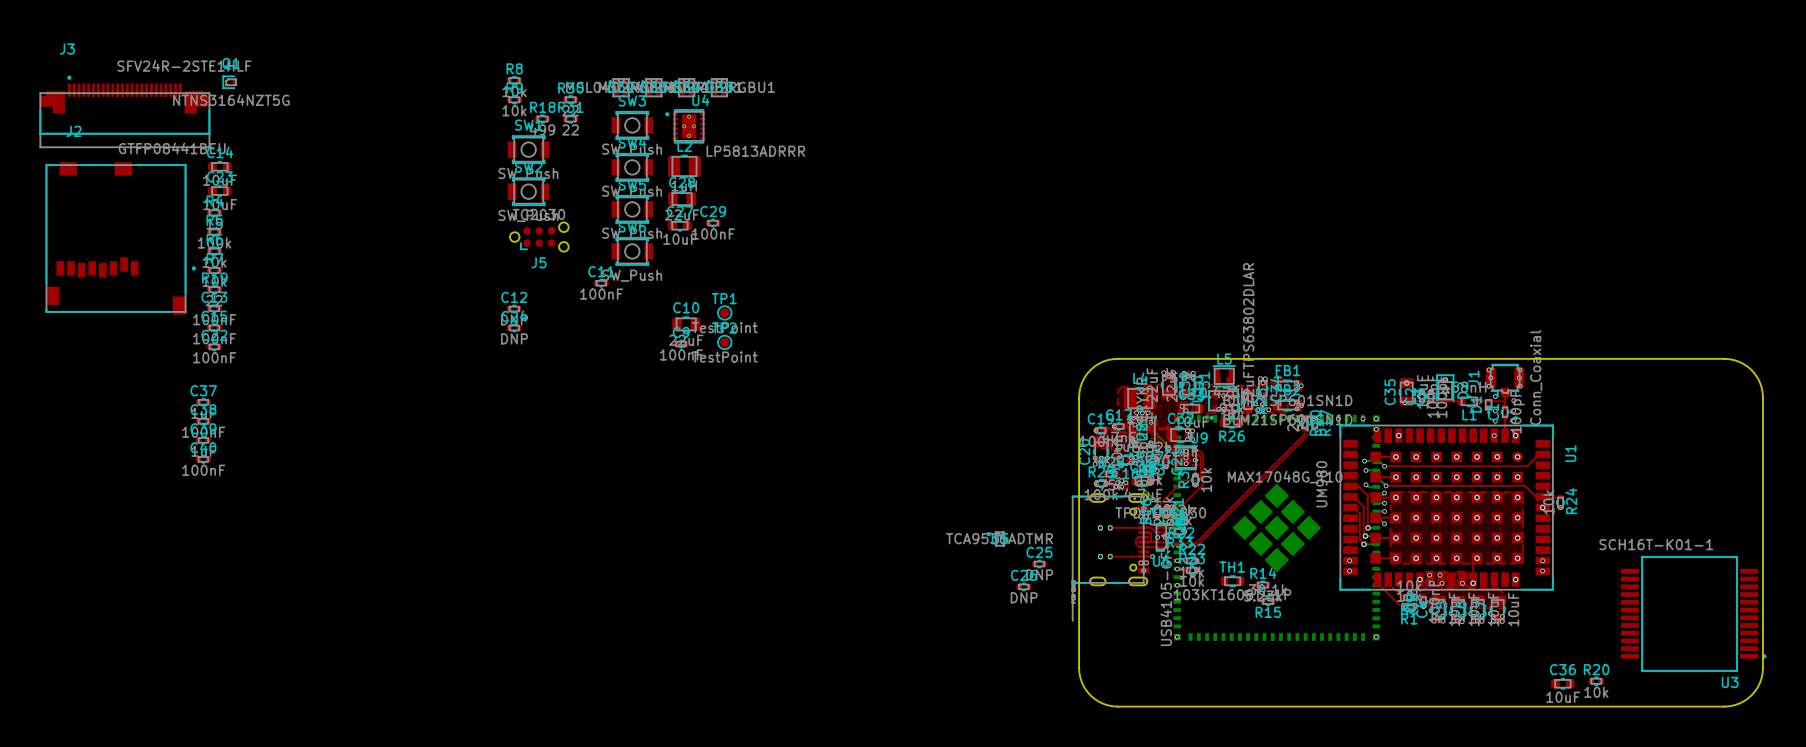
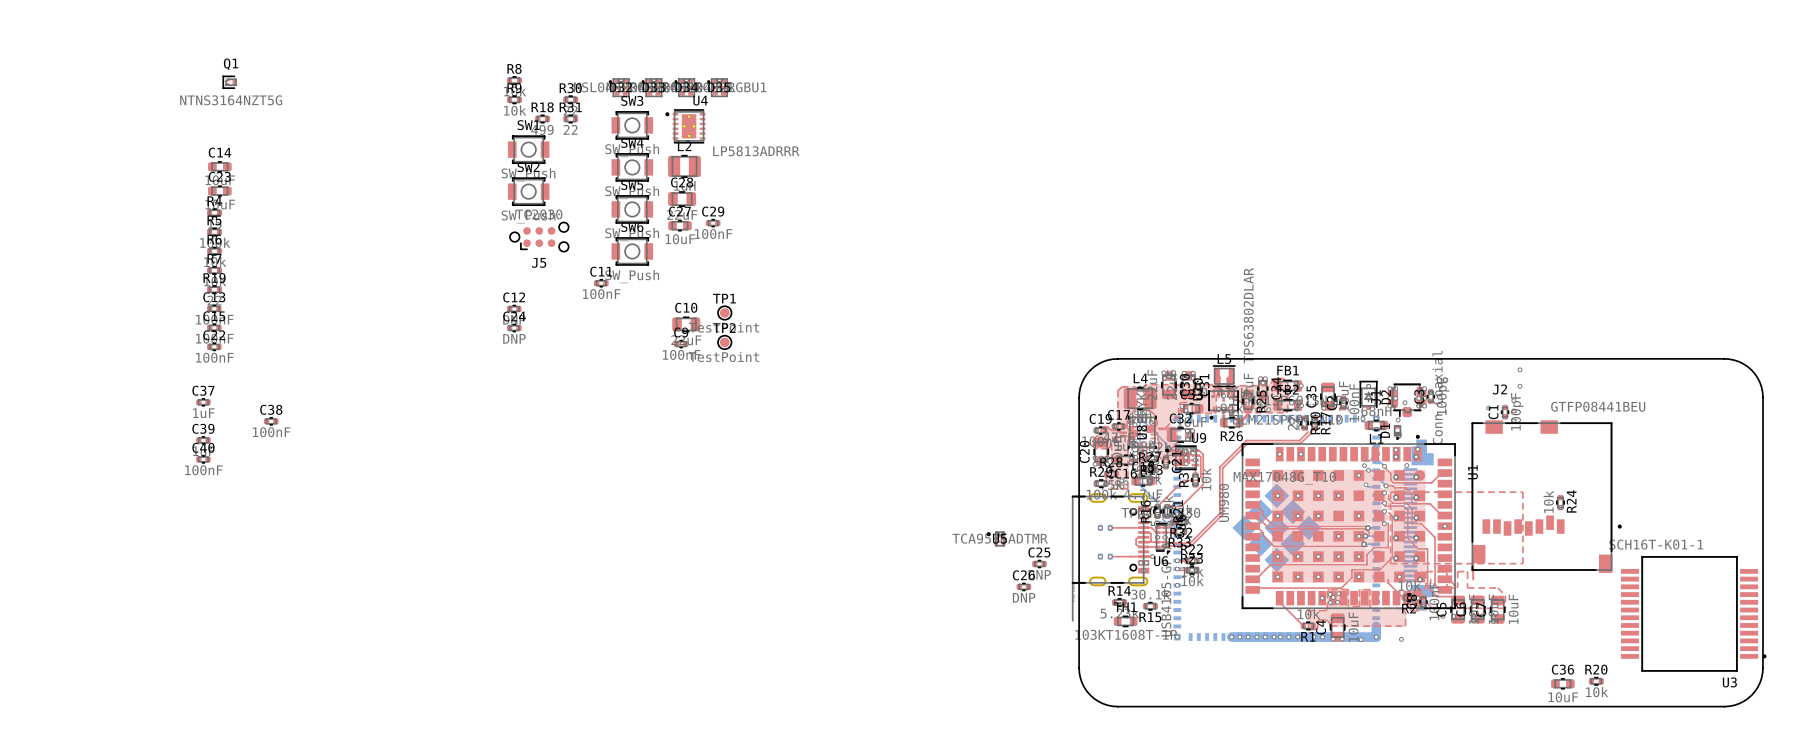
J3: SFV24R-2STE1HLF (124, 111) -> none
J2 position: (120, 238) -> (1546, 496)
via: (1489, 369) -> none
via: (1490, 377) -> none
via: (1519, 377) -> none
J1 position: (1505, 380) -> (1407, 400)
via: (1406, 383) -> none
via: none -> (1368, 386)
via: (1489, 386) -> none
via: none -> (1389, 388)
via: none -> (1395, 388)
via: none -> (1424, 388)
D2 position: (1445, 389) -> (1368, 395)
C35 position: (1406, 392) -> (1328, 396)
top track: (1505, 392) (1505, 407) -> none
C2 position: (1422, 396) -> (1343, 403)
via: (1495, 396) -> none
via: none -> (1389, 398)
via: none -> (1395, 398)
via: none -> (1418, 398)
via: none -> (1424, 398)
top track: (1406, 401) (1461, 401) -> none
L1 position: (1469, 401) -> (1376, 425)
top track: (1476, 401) (1505, 401) -> none
via: none -> (1389, 406)
via: none -> (1418, 406)
via: none -> (1424, 406)
D1 position: (1488, 406) -> (1397, 432)
via: none -> (1323, 408)
via: (1495, 410) -> none
top track: (1505, 416) (1505, 435) -> none
via: none -> (1398, 420)
C38 position: (203, 421) -> (271, 421)
via: (1495, 421) -> none
top track: (1304, 428) (1304, 434) (1195, 543) (1190, 543) -> (1308, 432) (1299, 440) (1246, 440) (1219, 467) (1219, 513) (1190, 543)
top track: (1310, 431) (1196, 545) (1191, 545) -> (1310, 431) (1300, 443) (1247, 443) (1222, 468) (1222, 514) (1191, 545)
via: (1494, 435) -> none
via: (1515, 435) -> none
via: none -> (1396, 449)
via: none -> (1417, 449)
via: none -> (1279, 454)
via: none -> (1300, 454)
top track: (1542, 454) (1539, 454) (1527, 466) (1384, 466) -> none
top track: (1375, 456) (1395, 456) -> none
via: (1436, 456) -> none
via: (1456, 456) -> none
via: (1477, 456) -> none
via: (1497, 456) -> none
via: (1517, 456) -> none
via: (1364, 461) -> none
via: none -> (1364, 465)
top track: none -> (1382, 465) (1390, 473) (1390, 480) (1393, 482) (1431, 482) (1441, 473) (1444, 473)
via: none -> (1406, 465)
via: (1366, 470) -> none
via: none -> (1368, 470)
via: none -> (1358, 475)
top track: (1375, 477) (1395, 477) -> none
via: (1436, 477) -> none
via: (1456, 477) -> none
via: (1477, 477) -> none
via: (1497, 477) -> none
via: (1517, 477) -> none
top track: none -> (1383, 485) (1405, 487) (1411, 493) (1411, 503) (1430, 503) (1441, 515) (1444, 515)
top track: (1386, 485) (1525, 485) (1536, 496) (1560, 497) -> none
top track: (1350, 486) (1358, 486) (1367, 495) (1368, 527) -> none
top track: none -> (1388, 494) (1388, 498) (1393, 503) (1406, 503) (1412, 508) (1412, 523) (1421, 523) (1435, 537) (1435, 584) (1440, 589) (1444, 589)
via: none -> (1277, 495)
via: none -> (1298, 495)
via: none -> (1318, 495)
via: none -> (1338, 495)
top track: (1350, 496) (1353, 496) (1363, 506) (1363, 534) (1365, 536) -> none
top track: (1375, 497) (1395, 497) -> none
via: (1436, 497) -> none
via: (1456, 497) -> none
via: (1477, 497) -> none
via: (1497, 497) -> none
via: (1517, 497) -> none
U1 position: (1446, 503) -> (1348, 521)
top track: none -> (1252, 504) (1256, 504) (1262, 511) (1262, 515) (1274, 526) (1369, 526)
top track: none -> (1384, 506) (1403, 506) (1407, 510) (1407, 538) (1418, 548) (1427, 548) (1427, 587) (1437, 596) (1454, 596) (1454, 585) (1448, 579) (1444, 579)
top track: (1350, 507) (1353, 507) (1359, 513) (1359, 540) (1363, 544) -> none
via: (1542, 507) -> none
top track: none -> (1388, 512) (1392, 516) (1392, 557) (1380, 569) (1351, 569) (1351, 577) (1341, 588) (1254, 588) (1252, 589)
top track: none -> (1252, 515) (1256, 515) (1269, 528) (1273, 528)
via: none -> (1277, 516)
via: none -> (1298, 516)
via: none -> (1318, 516)
via: none -> (1358, 516)
top track: (1375, 517) (1395, 517) -> none
via: (1436, 517) -> none
via: (1456, 517) -> none
via: (1477, 517) -> none
via: (1497, 517) -> none
via: (1517, 517) -> none
top track: none -> (1388, 523) (1388, 547) (1374, 547) (1367, 554) (1367, 564) (1270, 564) (1256, 579) (1252, 579)
part: none -> (1418, 525)
top track: none -> (1252, 526) (1256, 526) (1273, 546) (1367, 546)
via: none -> (1444, 526)
top track: none -> (1273, 528) (1365, 528) (1369, 532) (1369, 536)
via: none -> (1338, 536)
via: none -> (1358, 536)
top track: (1375, 538) (1395, 538) -> none
via: (1436, 538) -> none
via: (1456, 538) -> none
via: (1477, 538) -> none
via: (1497, 538) -> none
via: (1517, 538) -> none
via: none -> (1277, 556)
via: none -> (1298, 556)
via: none -> (1318, 556)
via: none -> (1338, 556)
via: none -> (1358, 556)
top track: (1375, 558) (1395, 558) -> none
via: (1436, 558) -> none
via: (1456, 558) -> none
via: (1477, 558) -> none
via: (1497, 558) -> none
via: (1517, 558) -> none
via: (1349, 560) -> none
via: (1542, 560) -> none
via: (1349, 571) -> none
via: (1542, 571) -> none
via: (1429, 575) -> none
via: (1439, 575) -> none
via: none -> (1277, 576)
via: none -> (1298, 576)
via: none -> (1318, 576)
via: none -> (1338, 576)
via: none -> (1358, 576)
via: none -> (1399, 576)
top track: (1377, 579) (1377, 582) (1404, 607) -> none
via: (1515, 579) -> none
TH1 position: (1232, 581) -> (1125, 621)
via: (1431, 583) -> none
via: (1441, 583) -> none
via: (1462, 583) -> none
via: (1473, 583) -> none
R14 position: (1262, 585) -> (1119, 602)
top zone outline: none -> (1369, 589) (1359, 590) (1359, 606) (1348, 606) (1348, 589) (1329, 589) (1327, 591) (1327, 608) (1308, 610) (1308, 629) (1315, 629) (1318, 619) (1326, 619) (1330, 626) (1404, 626) (1405, 612) (1401, 608) (1371, 608) (1369, 606) (1369, 589)
via: none -> (1338, 593)
via: none -> (1330, 594)
via: none -> (1333, 597)
top track: none -> (1279, 598) (1279, 602) (1303, 625) (1301, 625)
via: none -> (1322, 598)
via: none -> (1417, 598)
R15 position: (1268, 601) -> (1150, 606)
via: none -> (1330, 602)
via: none -> (1337, 602)
R1 position: (1409, 607) -> (1308, 625)
C4 position: (1438, 609) -> (1337, 627)
via: (1434, 616) -> none
via: (1502, 616) -> none
via: (1433, 621) -> none
via: (1442, 621) -> none
via: (1453, 621) -> none
via: (1462, 621) -> none
via: (1481, 621) -> none
via: (1502, 621) -> none
bottom track: none -> (1376, 626) (1376, 637) (1231, 637)
via: none -> (1231, 637)
via: none -> (1239, 637)
via: none -> (1248, 637)
via: none -> (1257, 637)
via: none -> (1265, 637)
via: none -> (1274, 637)
via: none -> (1280, 637)
via: none -> (1288, 637)
via: none -> (1297, 637)
via: none -> (1313, 637)
via: none -> (1322, 637)
via: none -> (1333, 639)
via: none -> (1342, 639)
via: none -> (1361, 639)
via: none -> (1401, 639)

